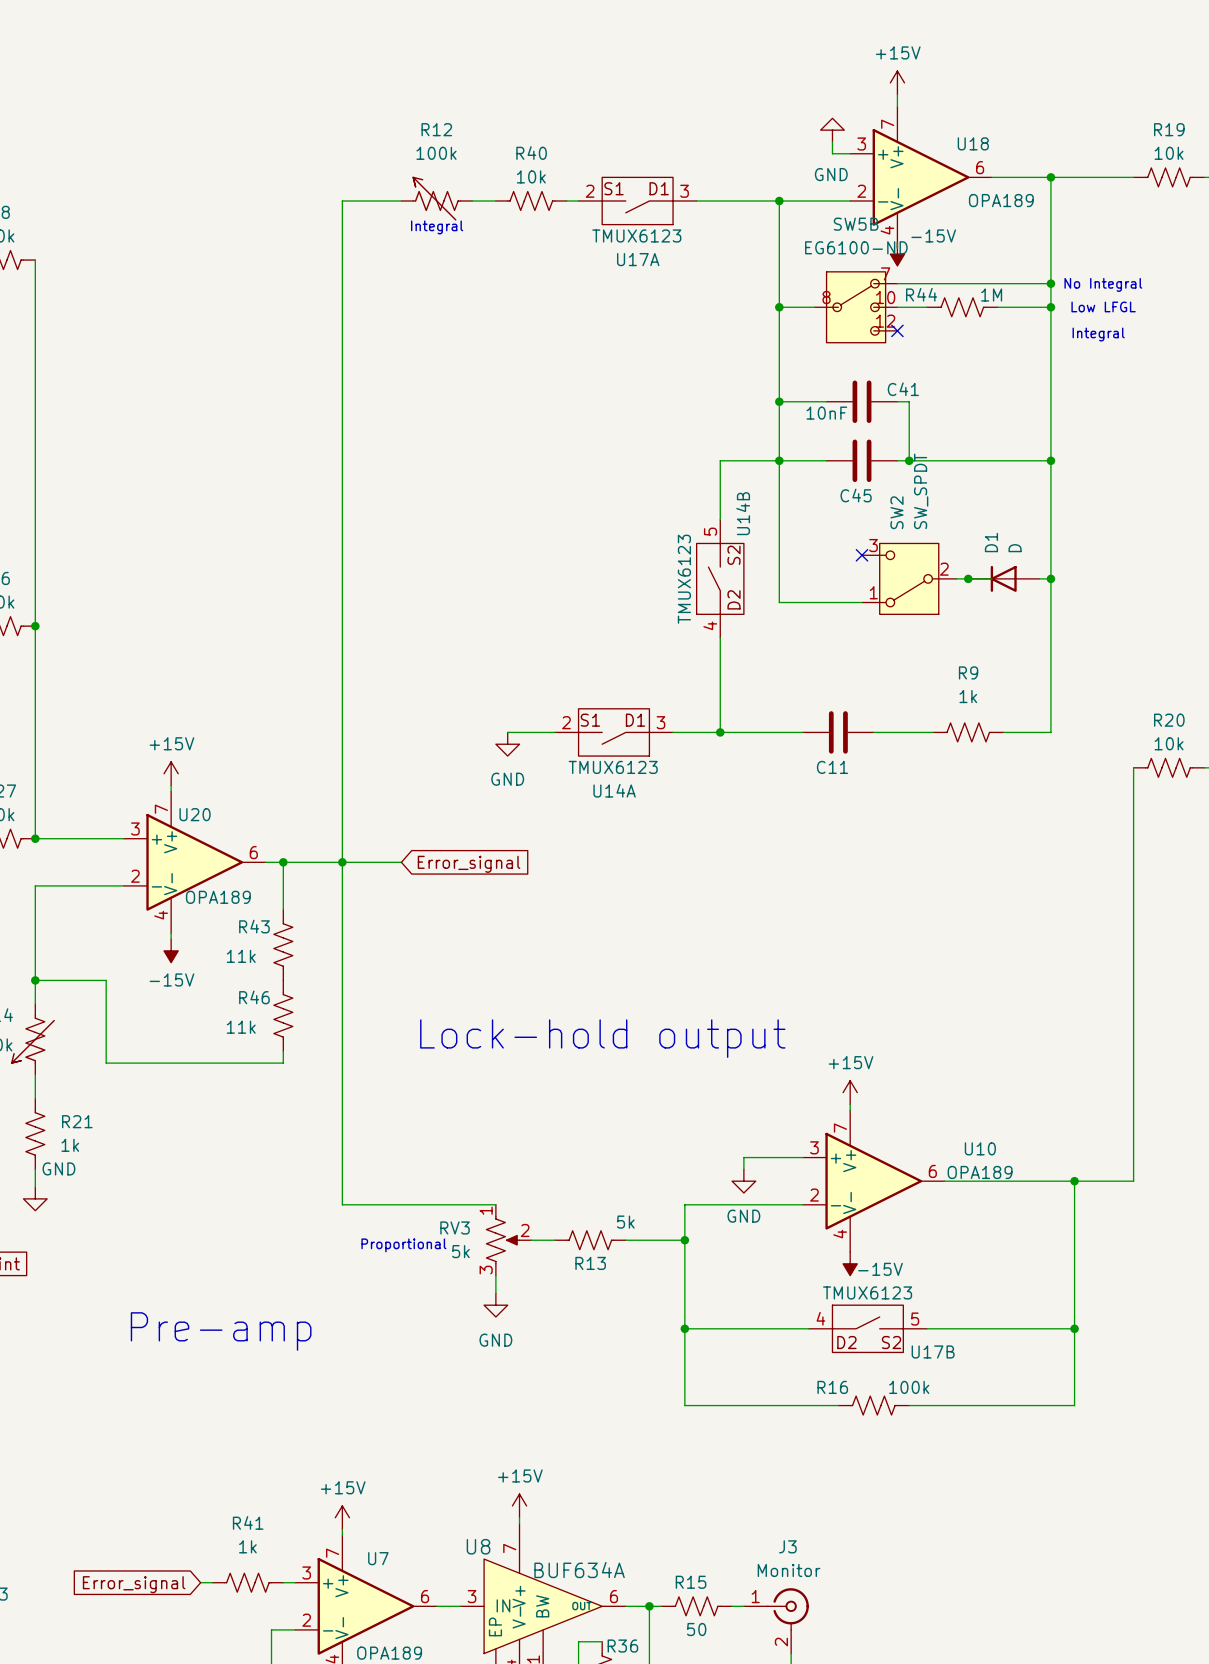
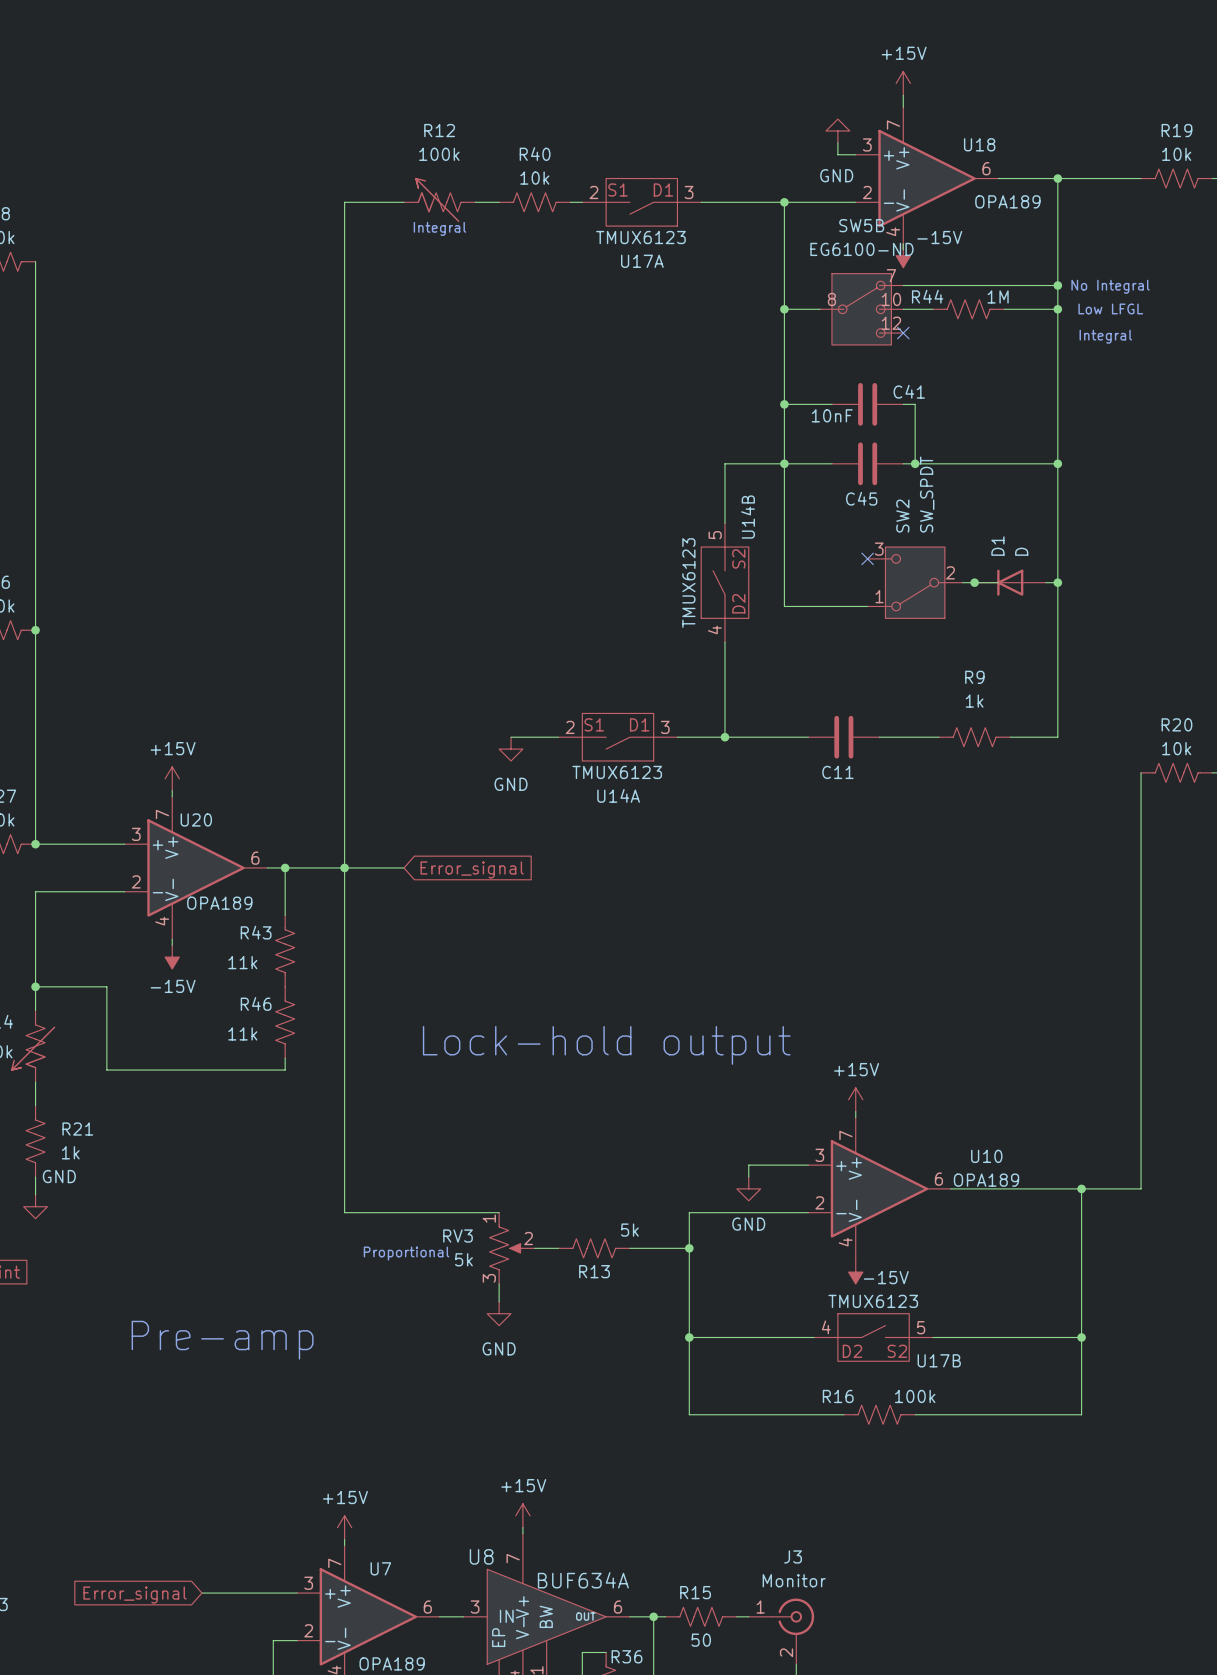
R41: 1k (247, 1582) -> none

